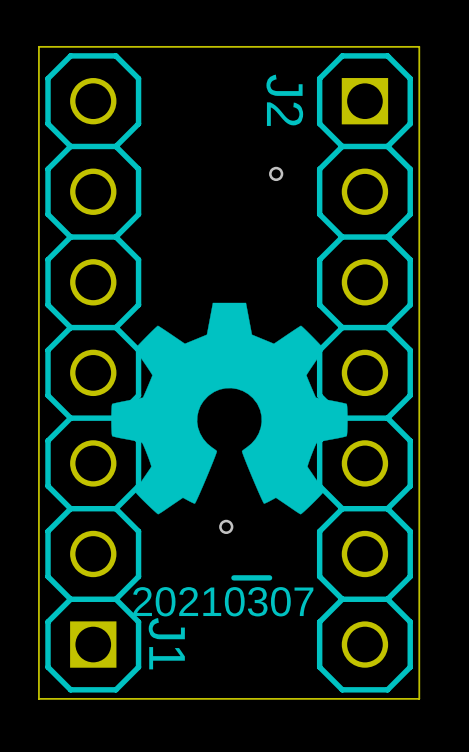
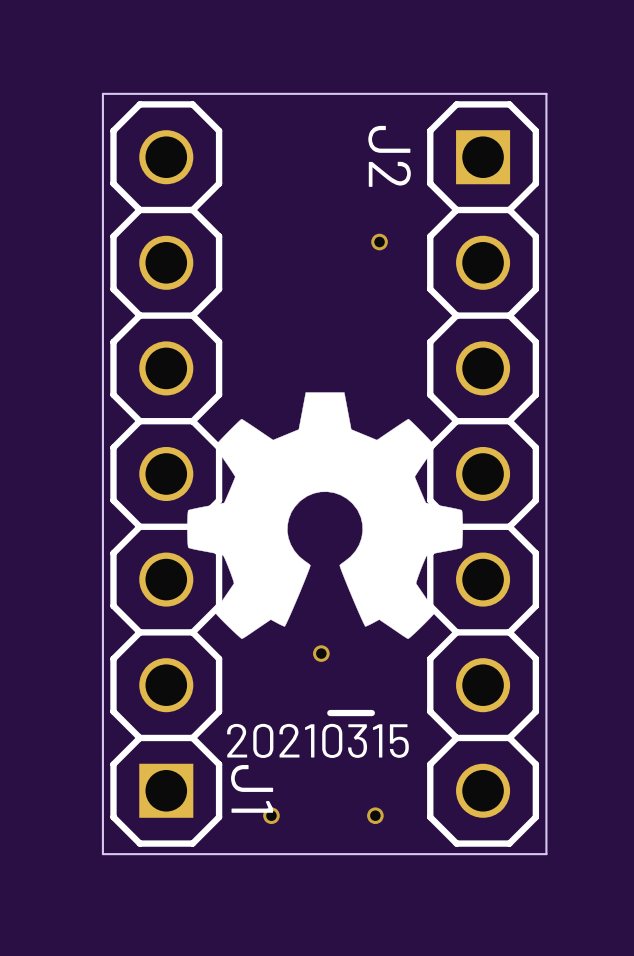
drawing shape: [133, 575, 314, 617] -> [227, 709, 409, 758]
via: none -> (271, 815)
via: none -> (375, 815)

